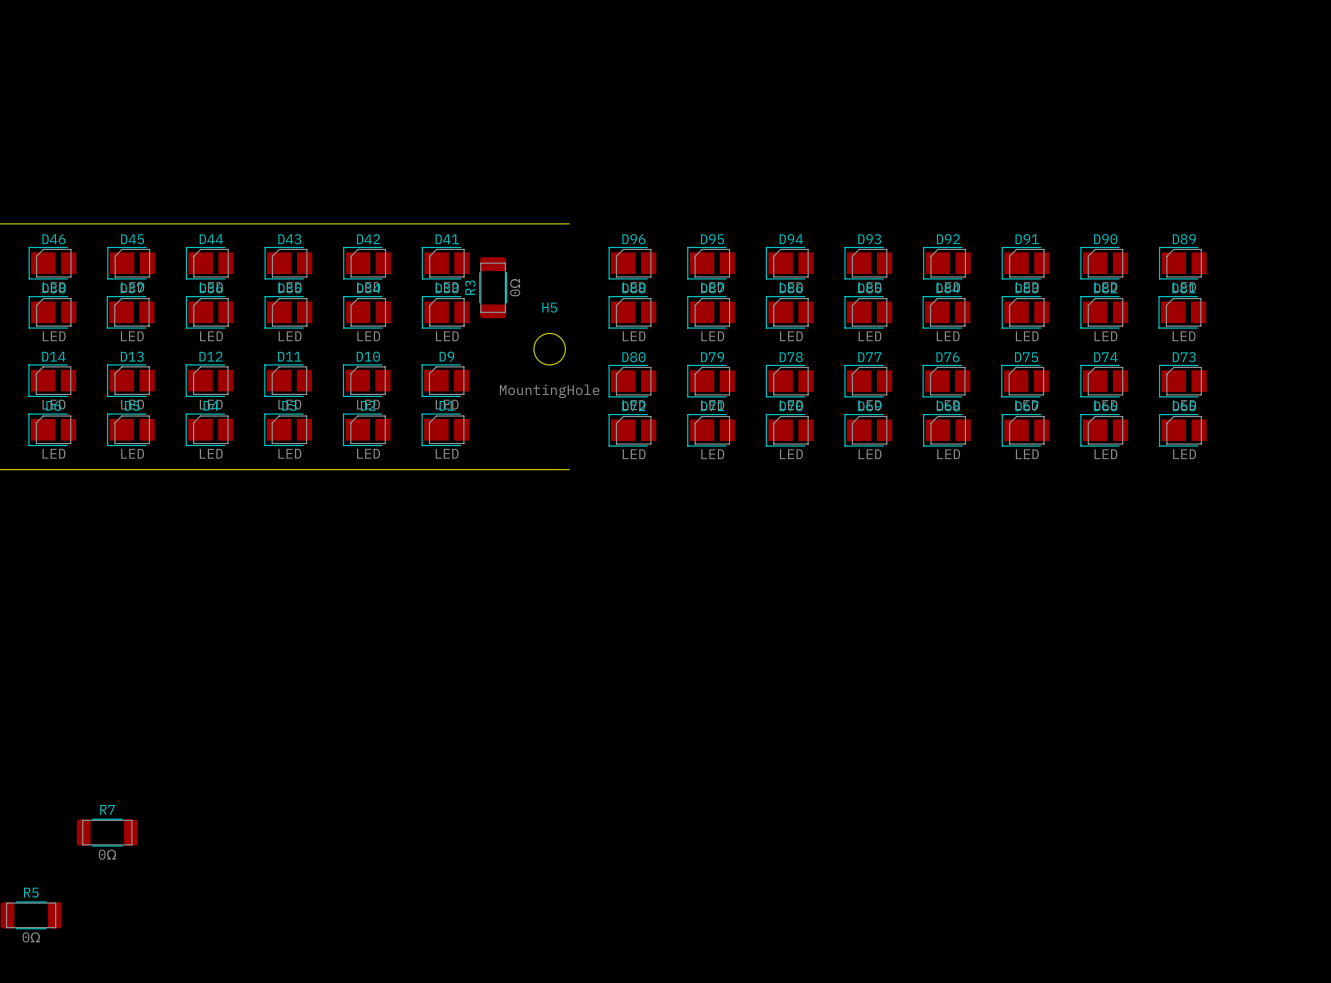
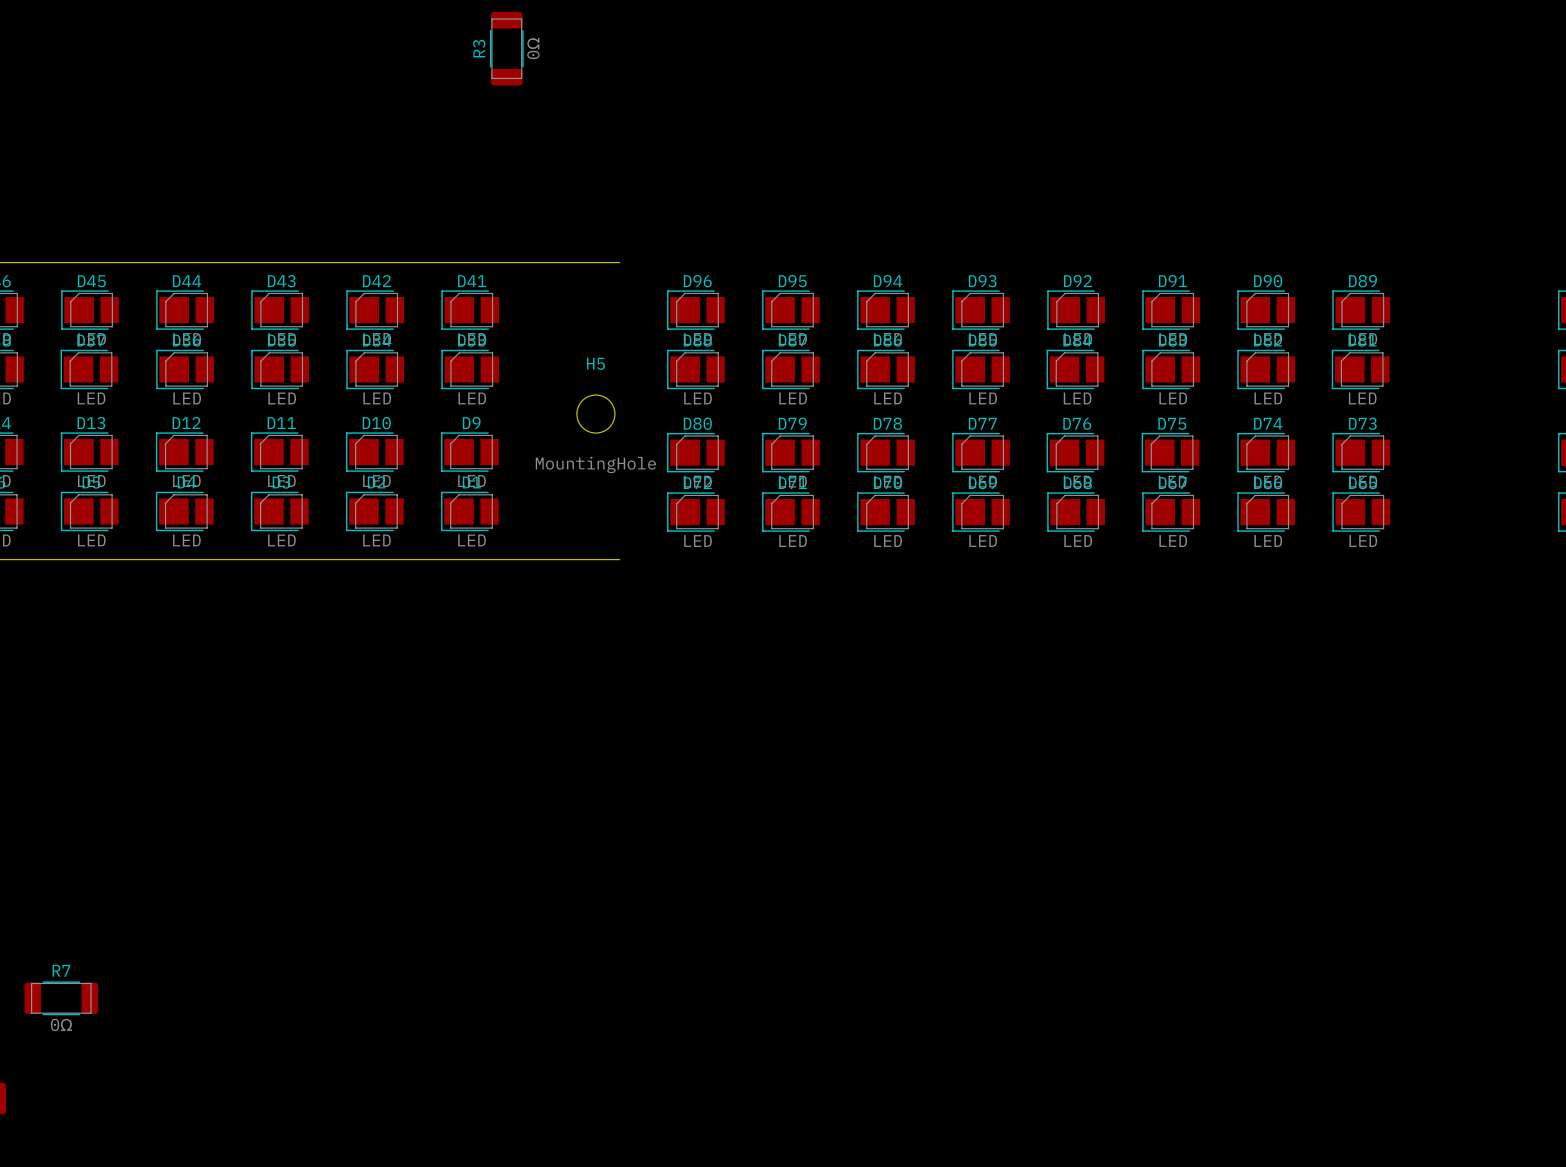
R3 position: (493, 287) -> (506, 48)

